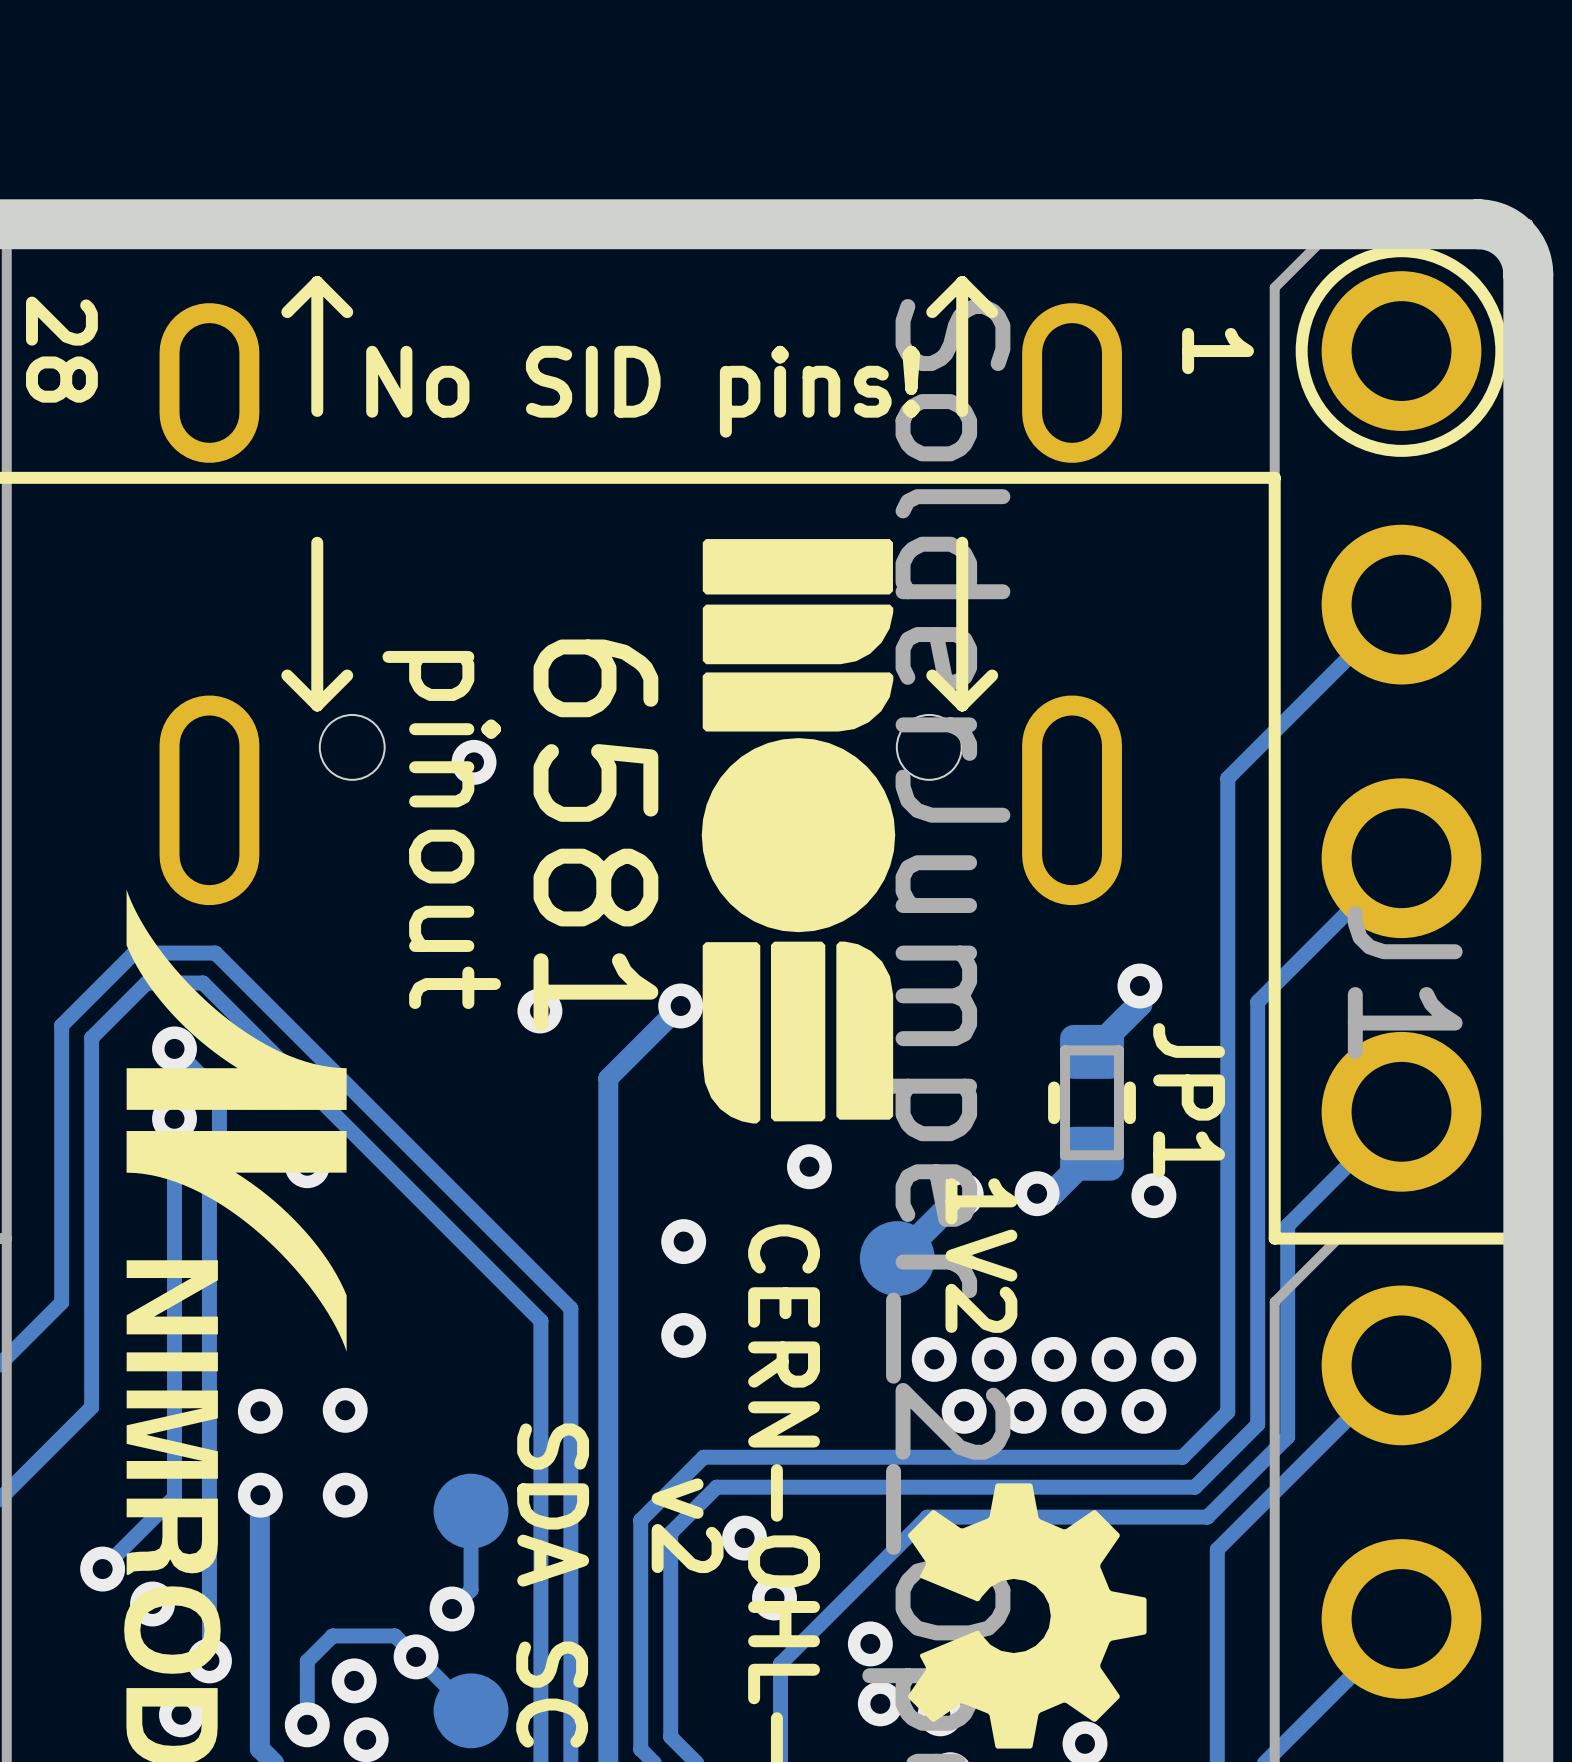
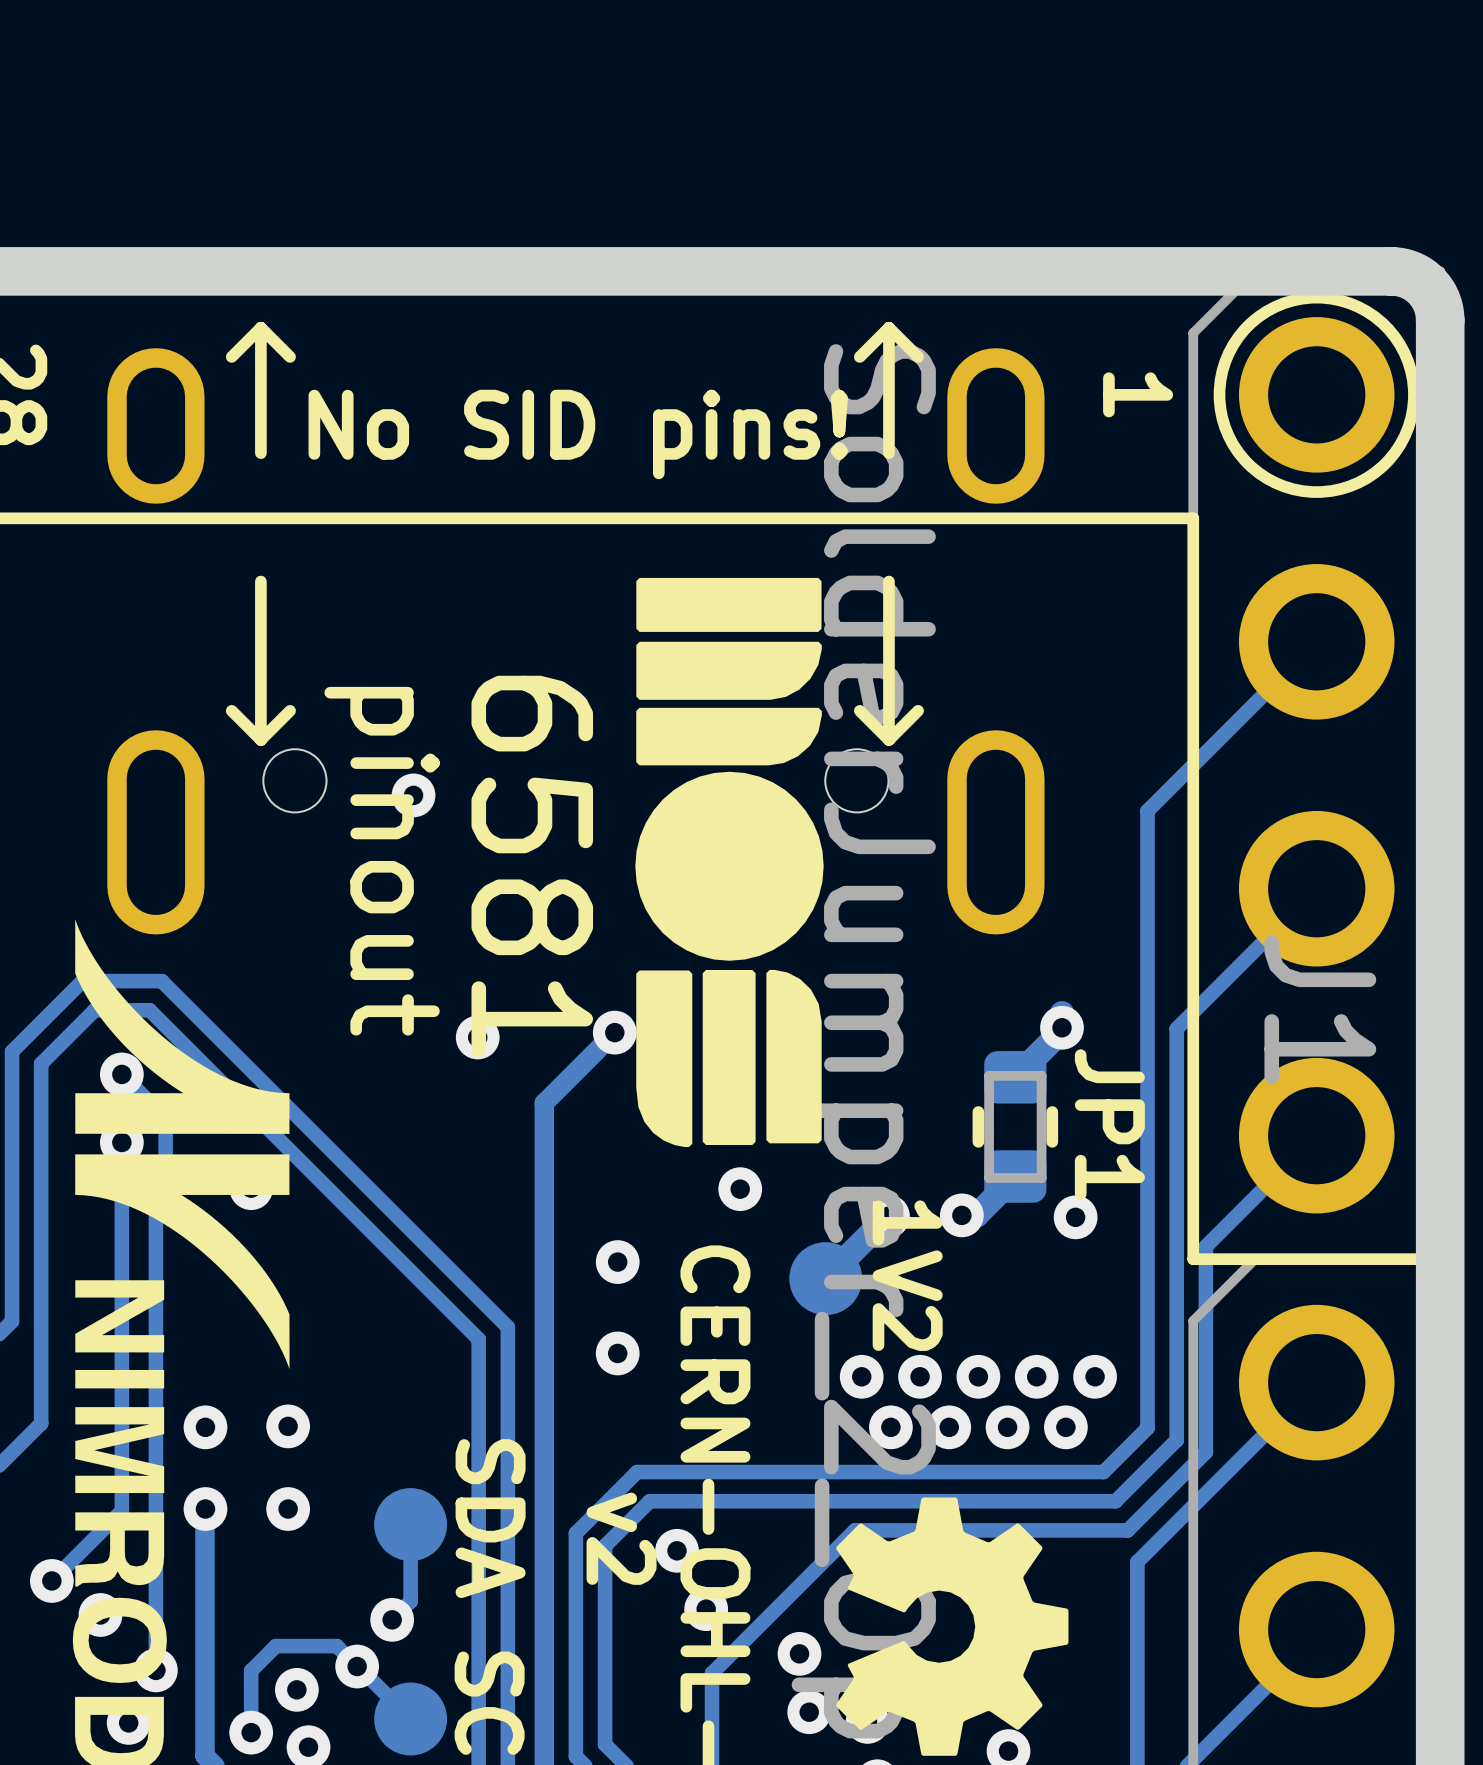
via position: (1139, 986) -> (1062, 1027)

